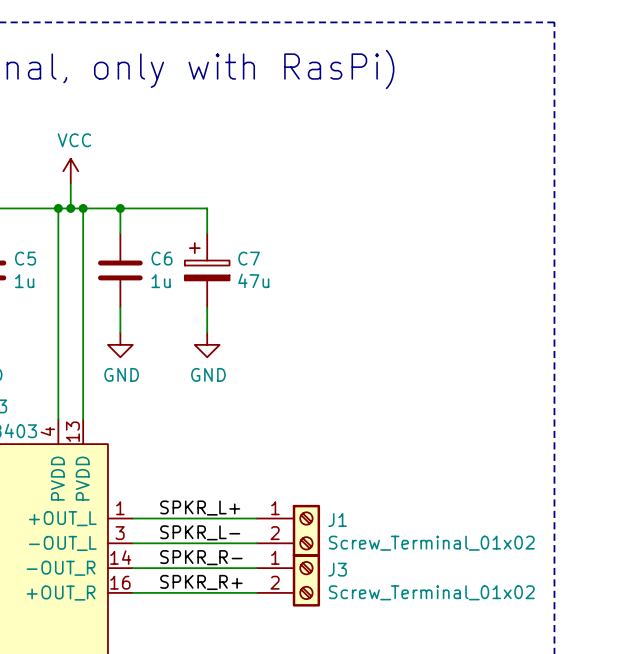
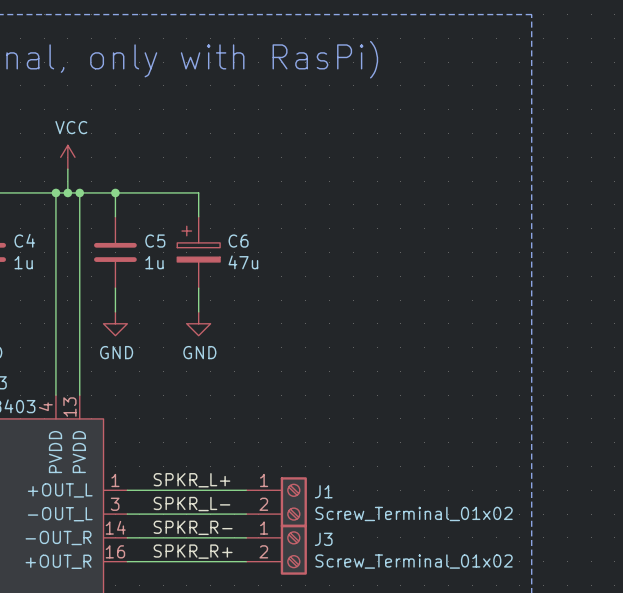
C5 name: C5 (25, 258) -> C4 (24, 240)
C6 name: C6 (161, 258) -> C5 (155, 241)
C7 name: C7 (249, 258) -> C6 (238, 241)

